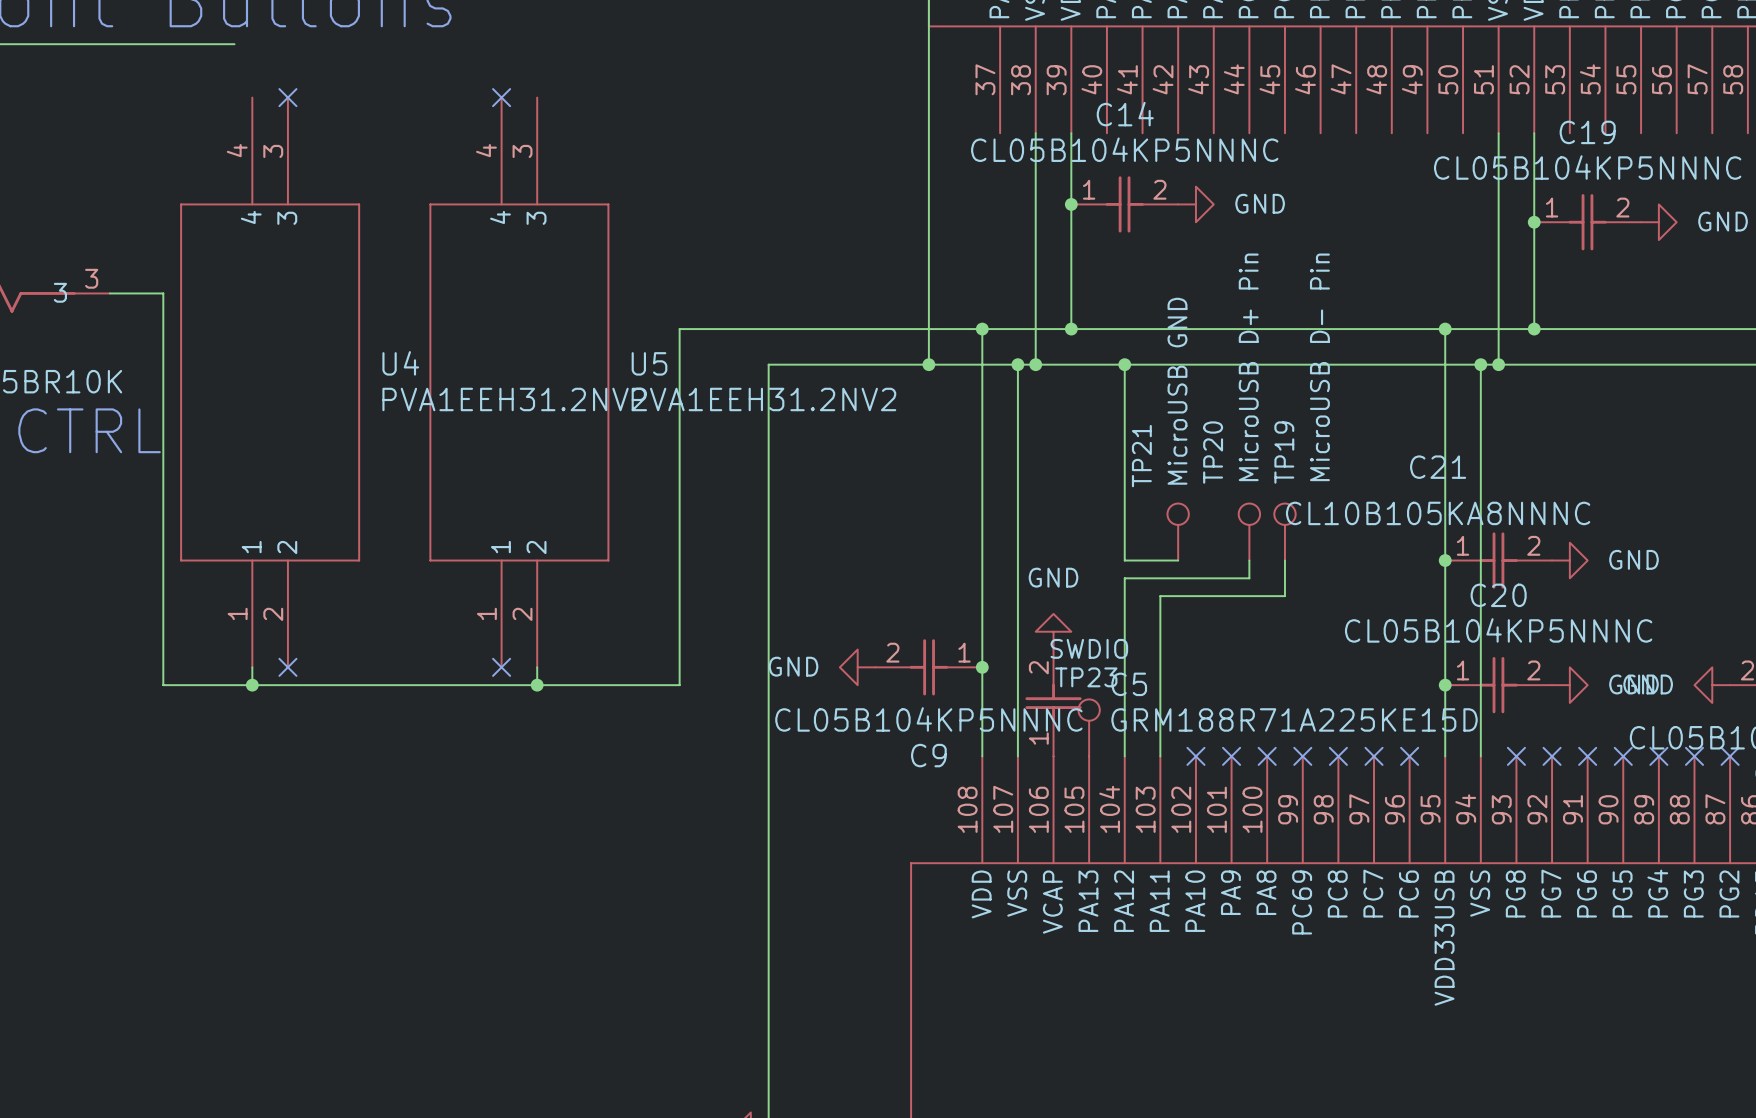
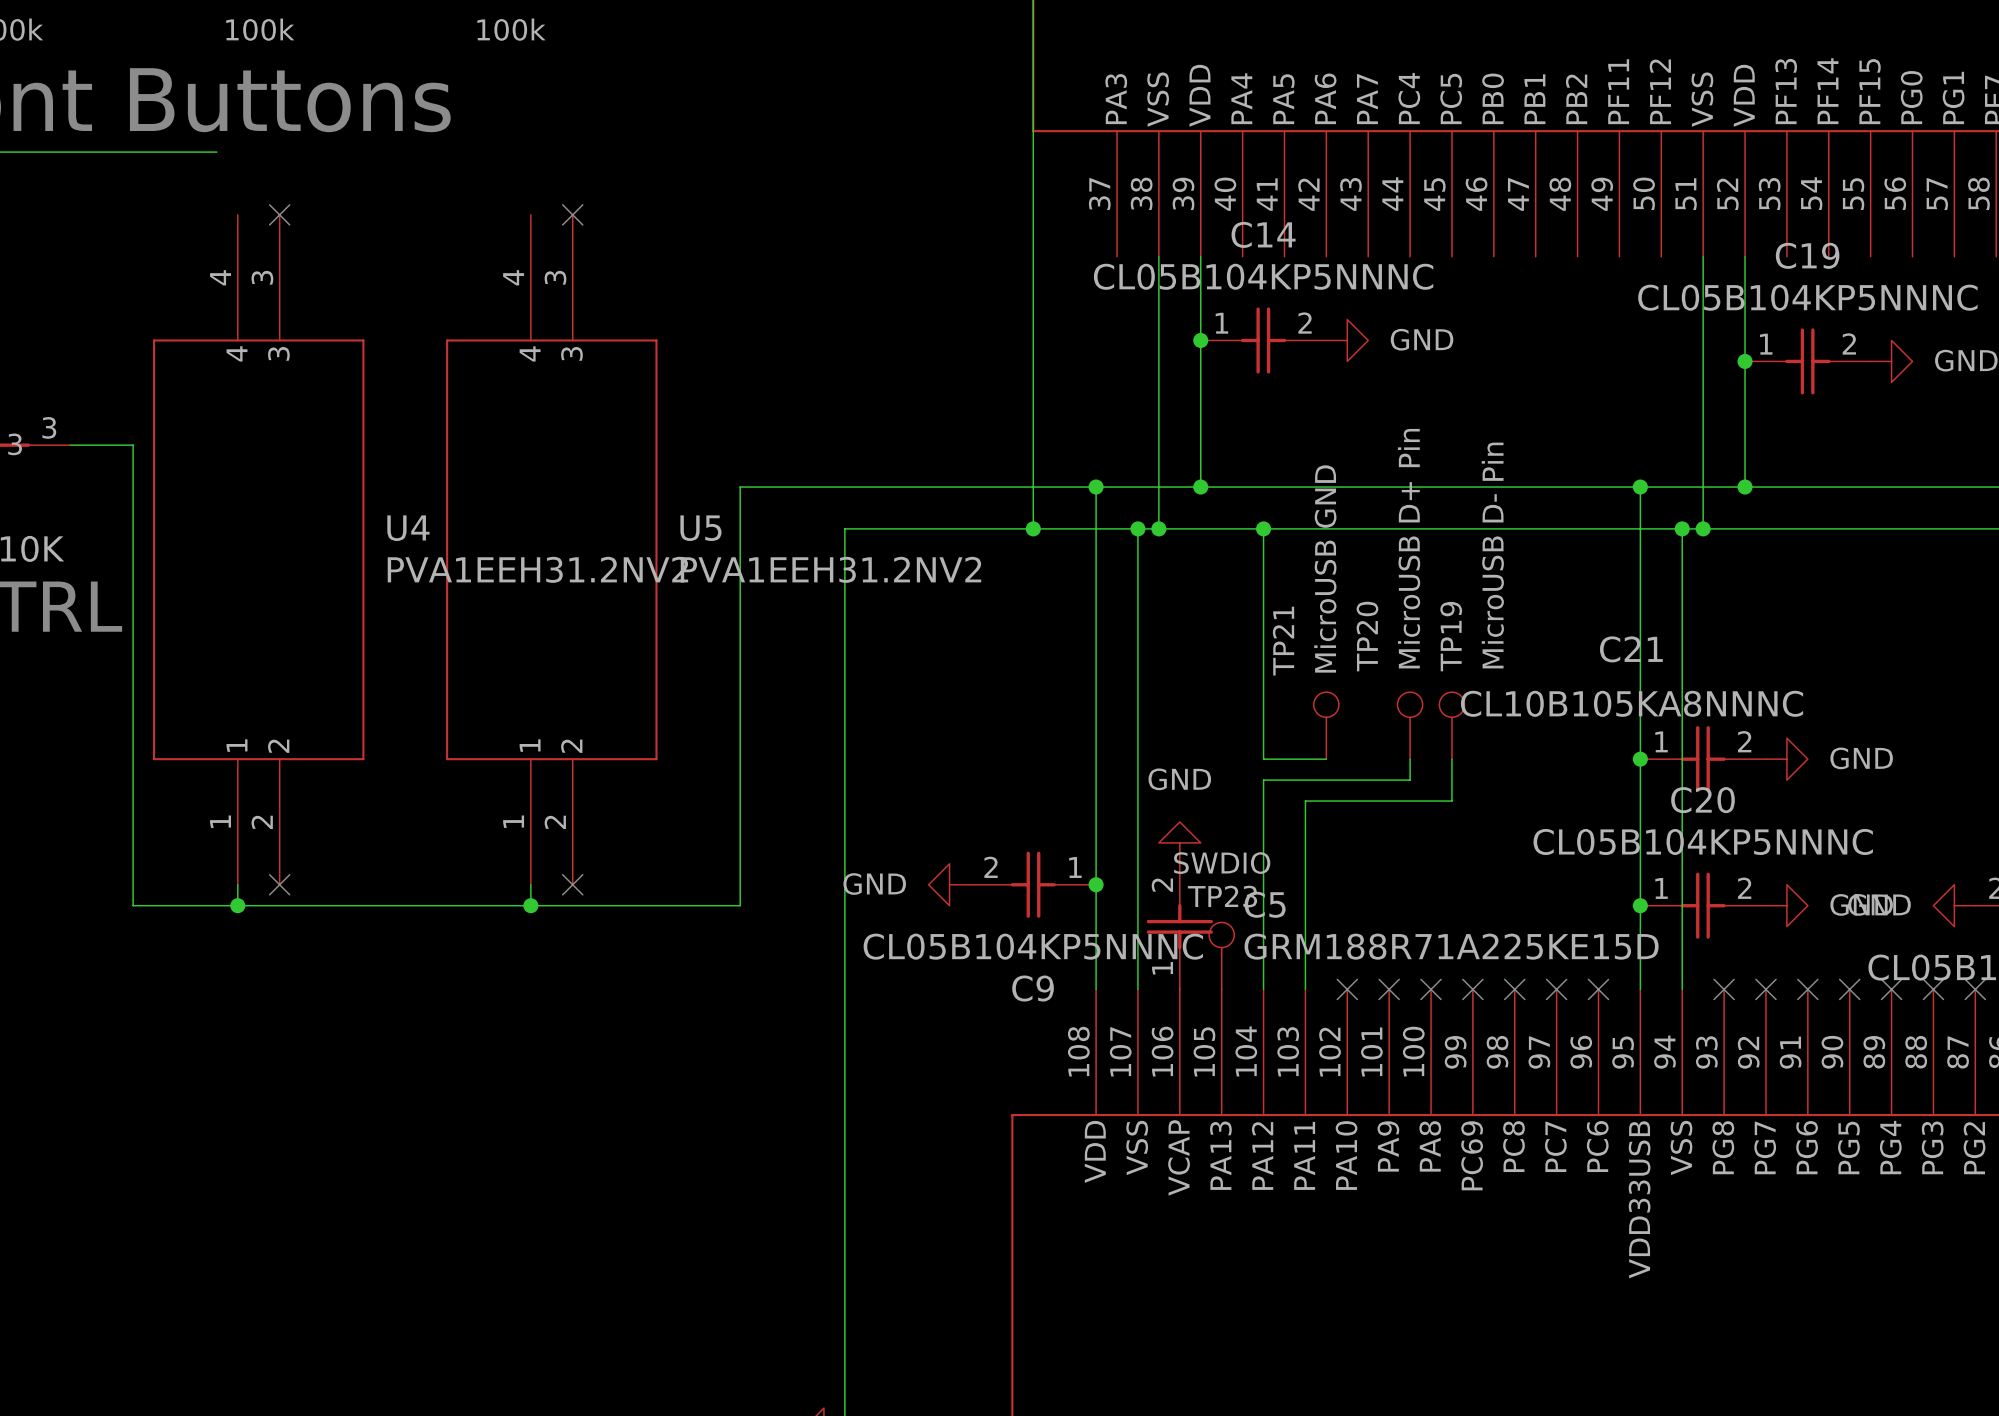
no-connect mark position: (501, 97) -> (572, 214)
no-connect mark position: (501, 667) -> (572, 884)
wire: (537, 667) (537, 685) -> (530, 884) (530, 905)
junction position: (537, 685) -> (530, 905)

